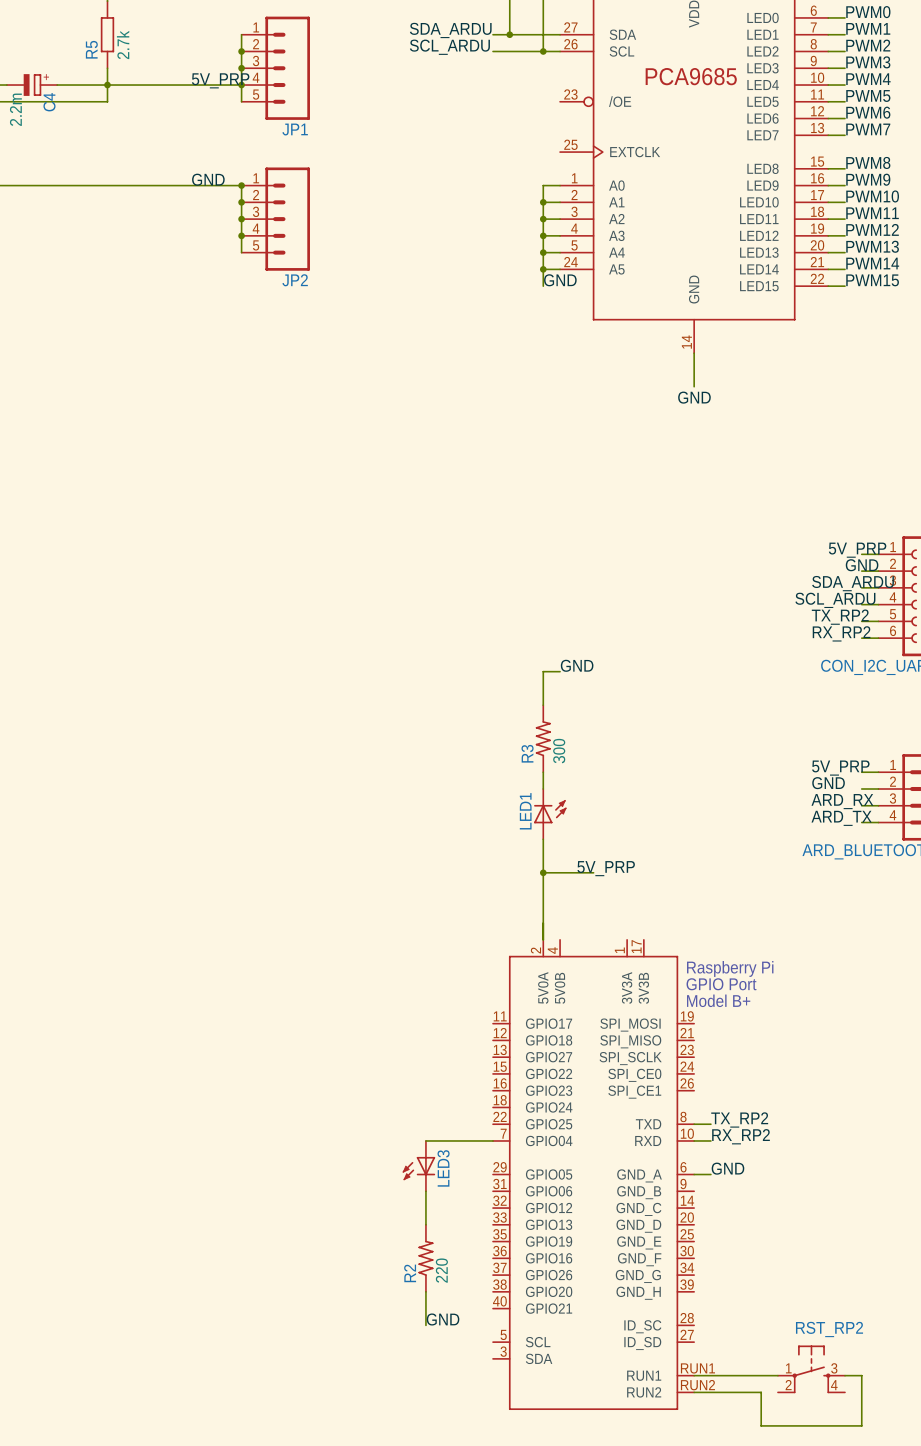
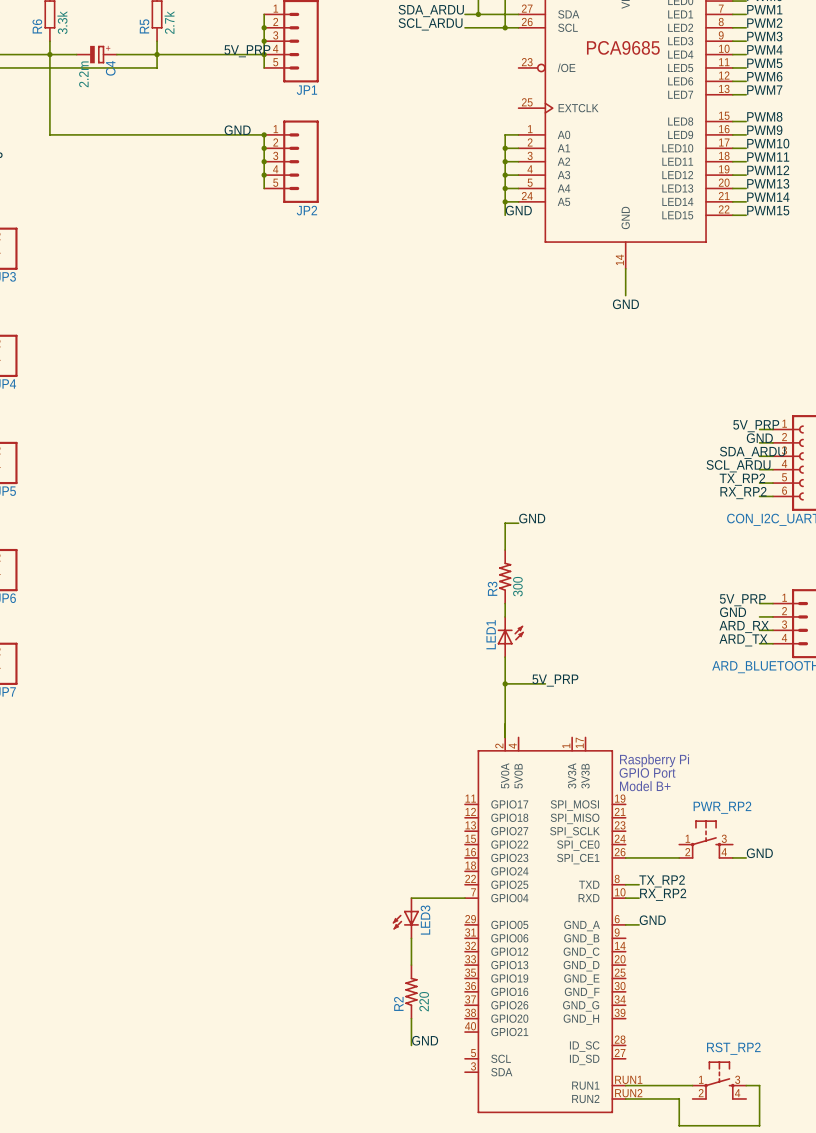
PWR_RP2: none -> (706, 839)
label: none -> GND (759, 853)
wire: none -> (625, 857) (679, 857)
wire: none -> (732, 857) (746, 857)

